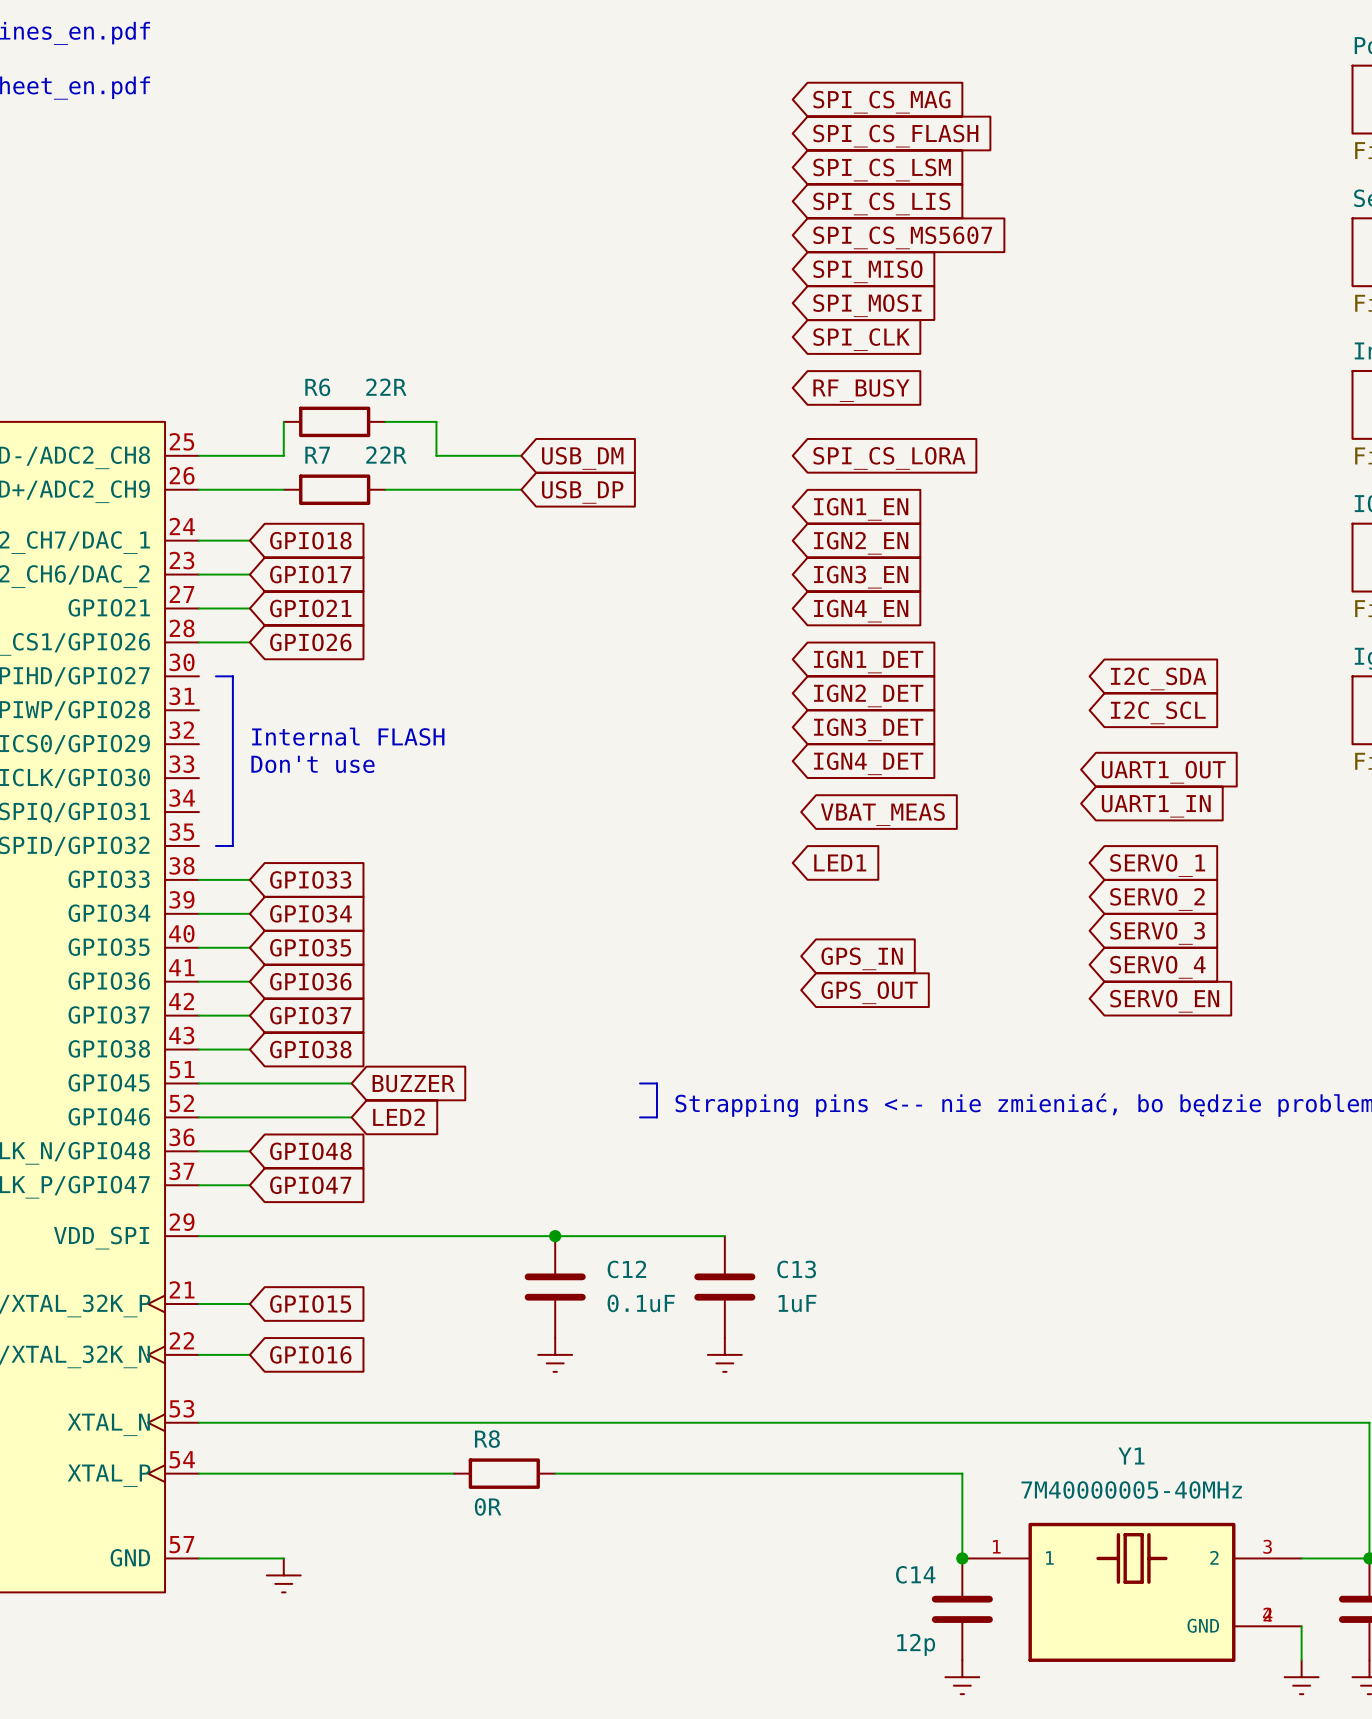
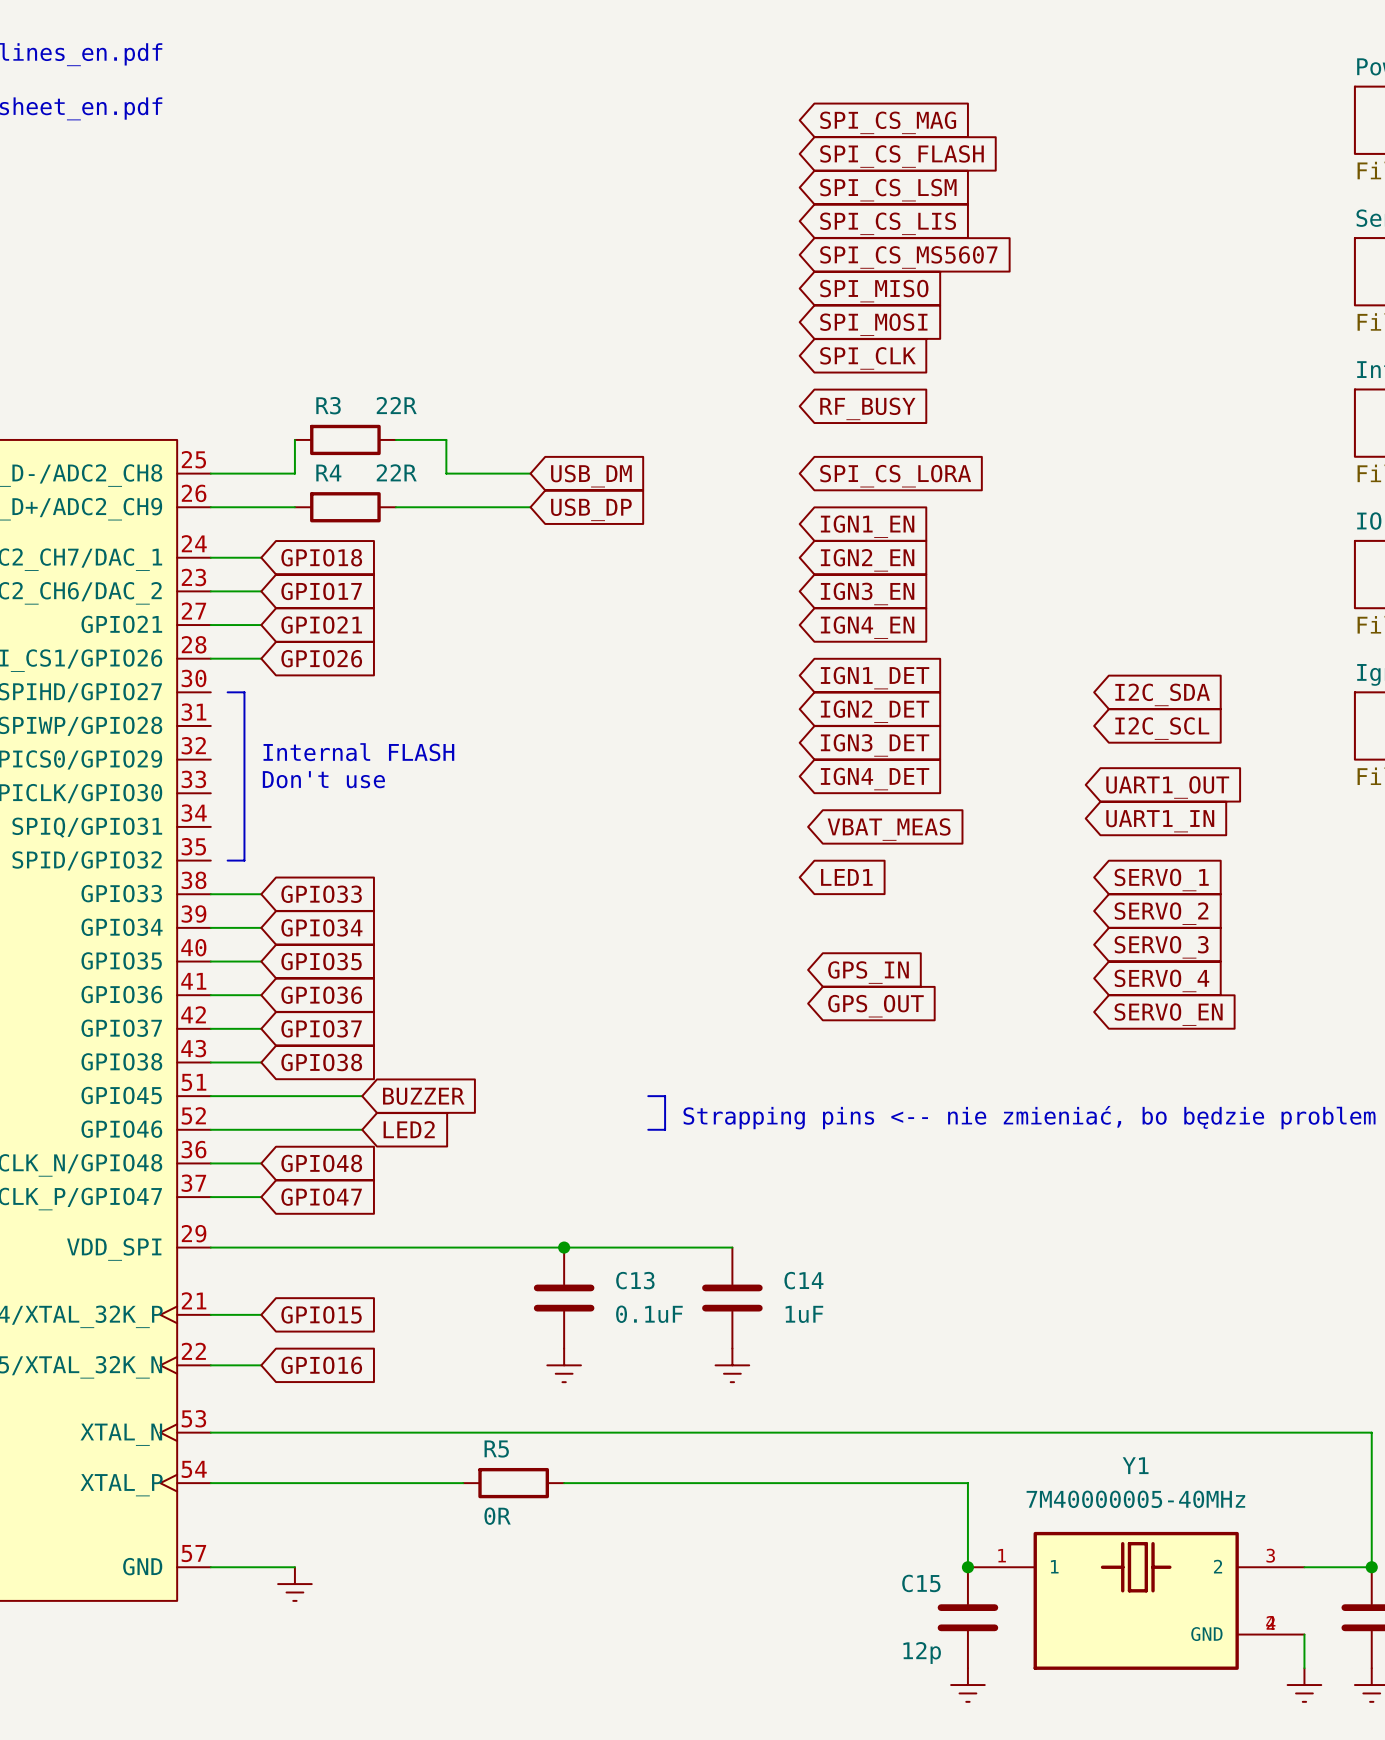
R6 name: R6 (317, 387) -> R3 (328, 405)
R7 name: R7 (317, 455) -> R4 (328, 472)
C12 name: C12 (626, 1269) -> C13 (635, 1280)
C13 name: C13 (796, 1269) -> C14 (803, 1280)
R8 name: R8 (487, 1439) -> R5 (496, 1449)
C14 name: C14 (915, 1574) -> C15 (921, 1583)

